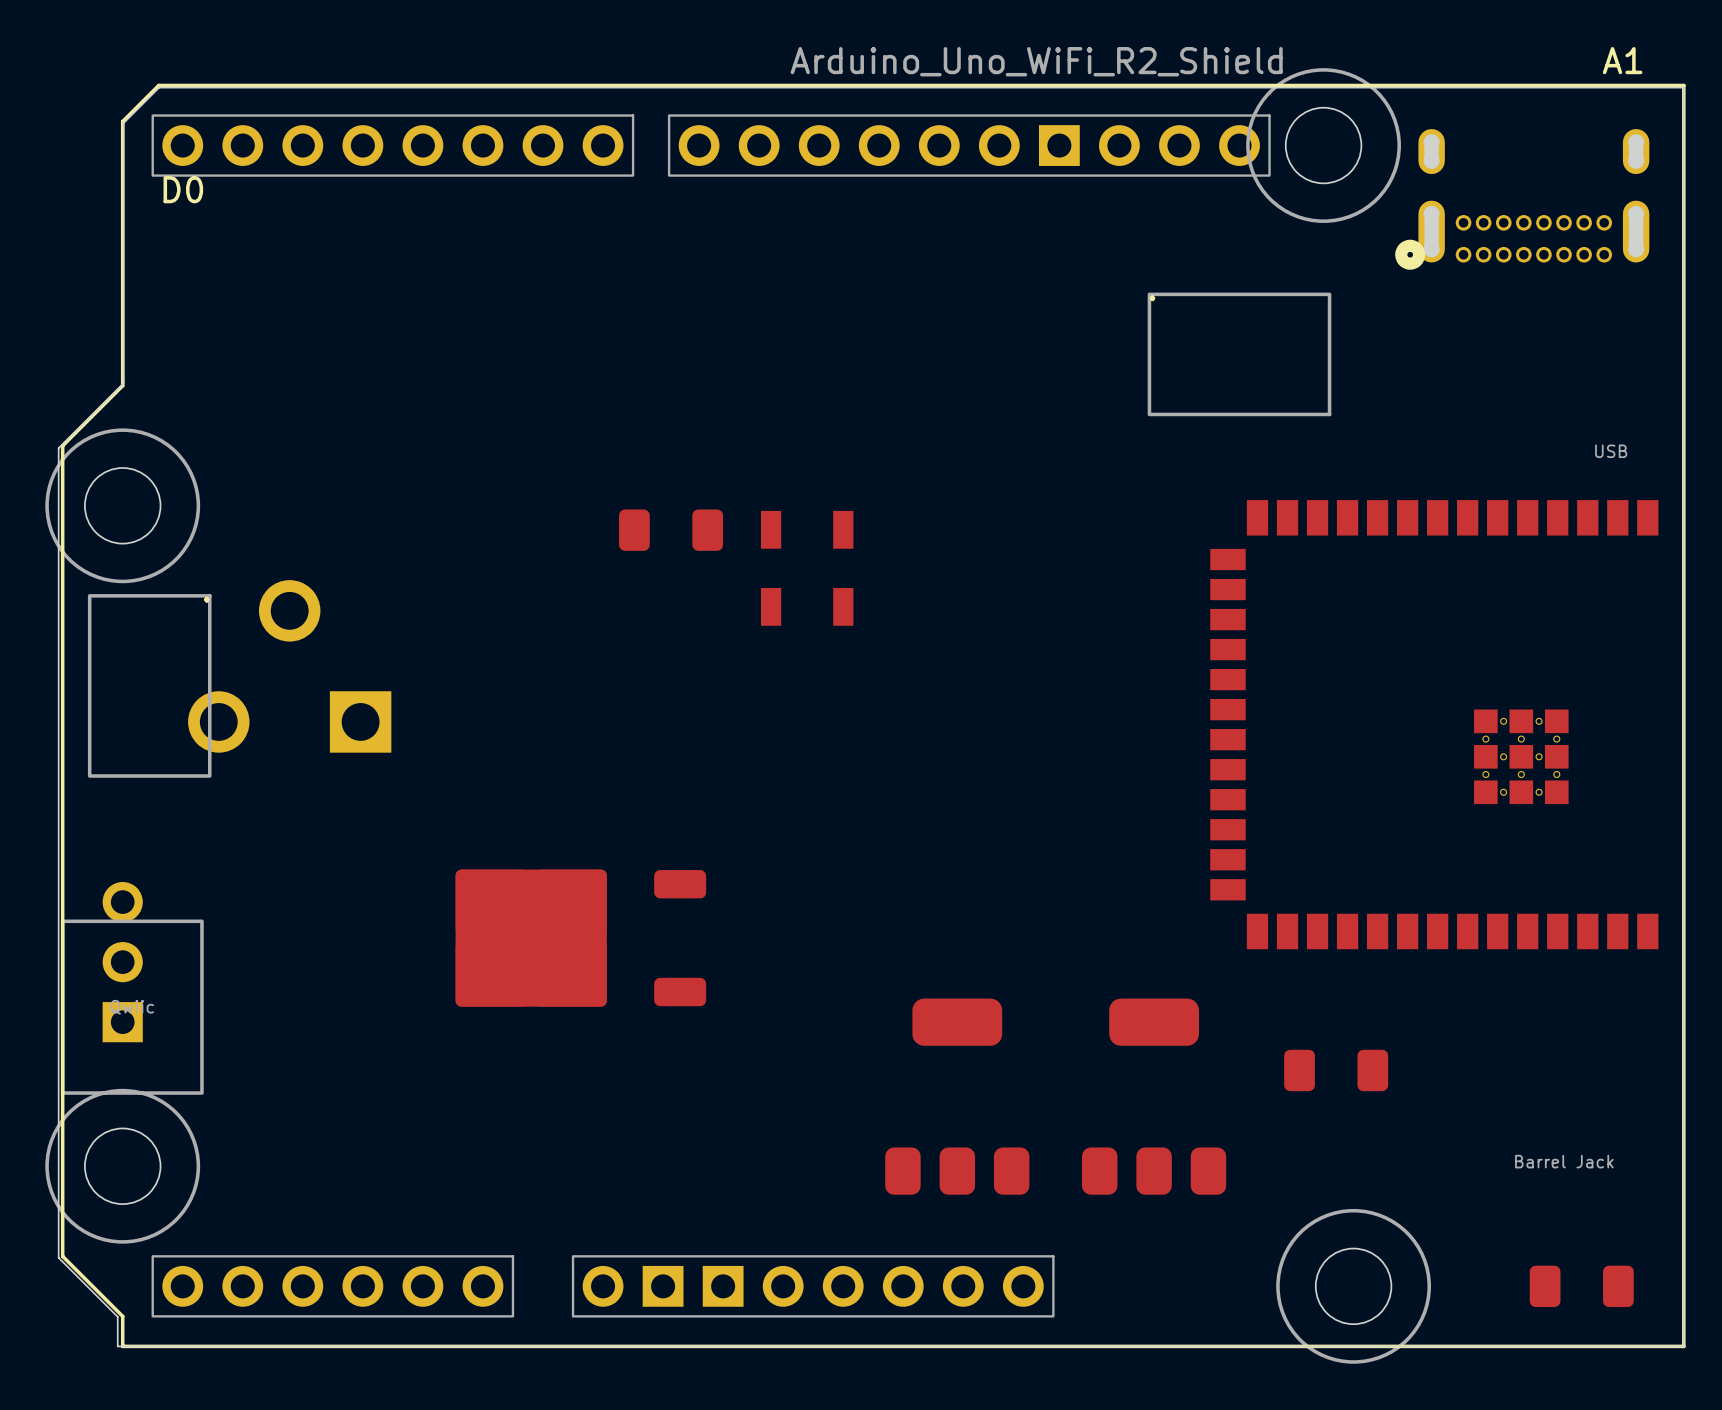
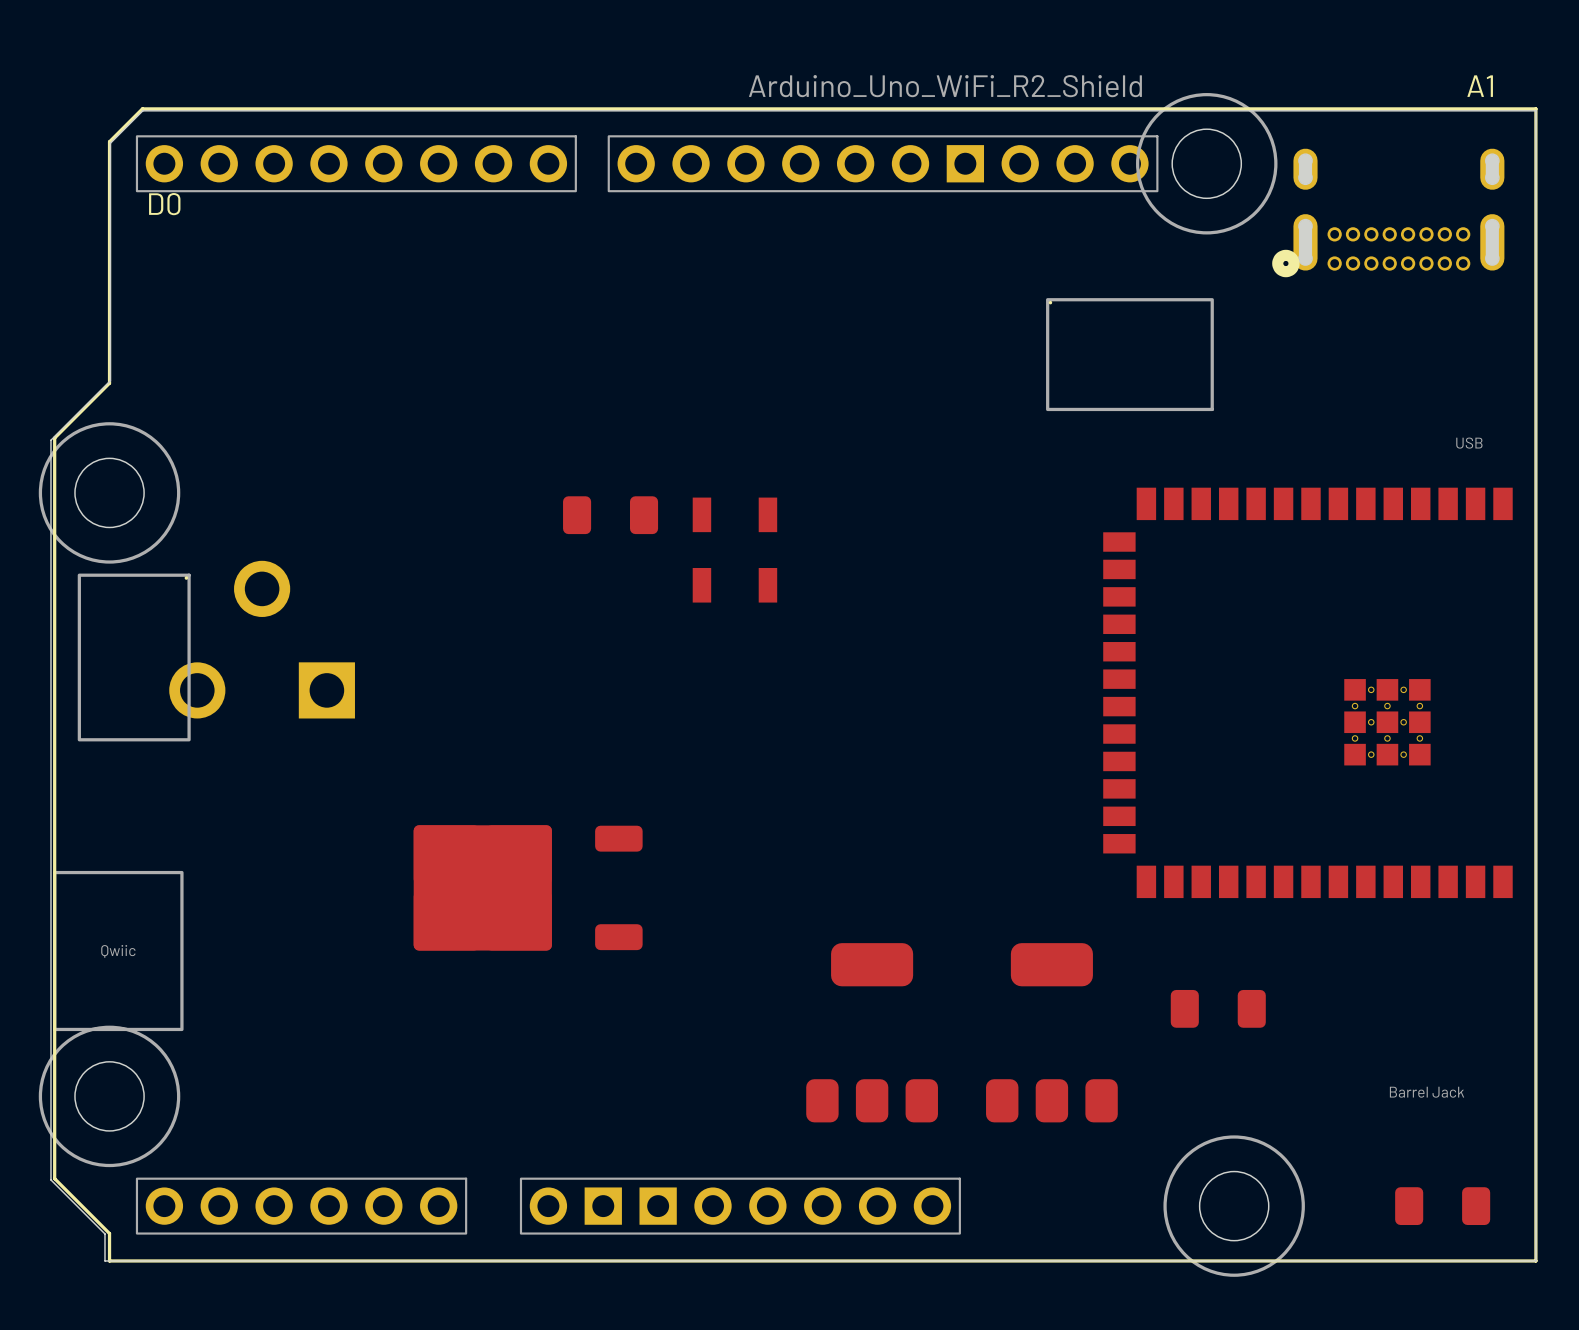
part: (122, 962) -> none

